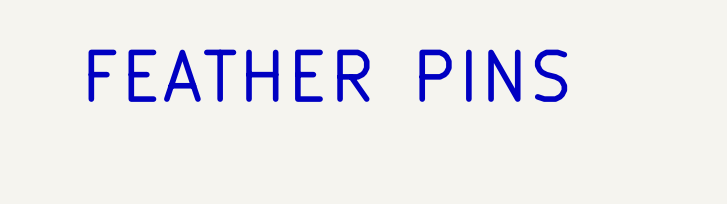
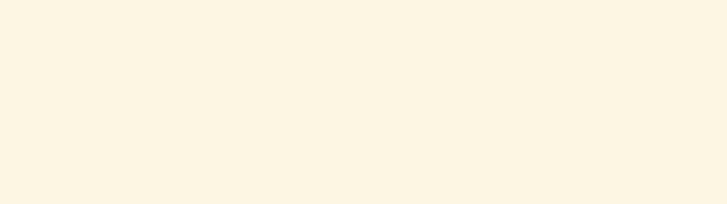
text: FEATHER PINS (327, 75) -> none

